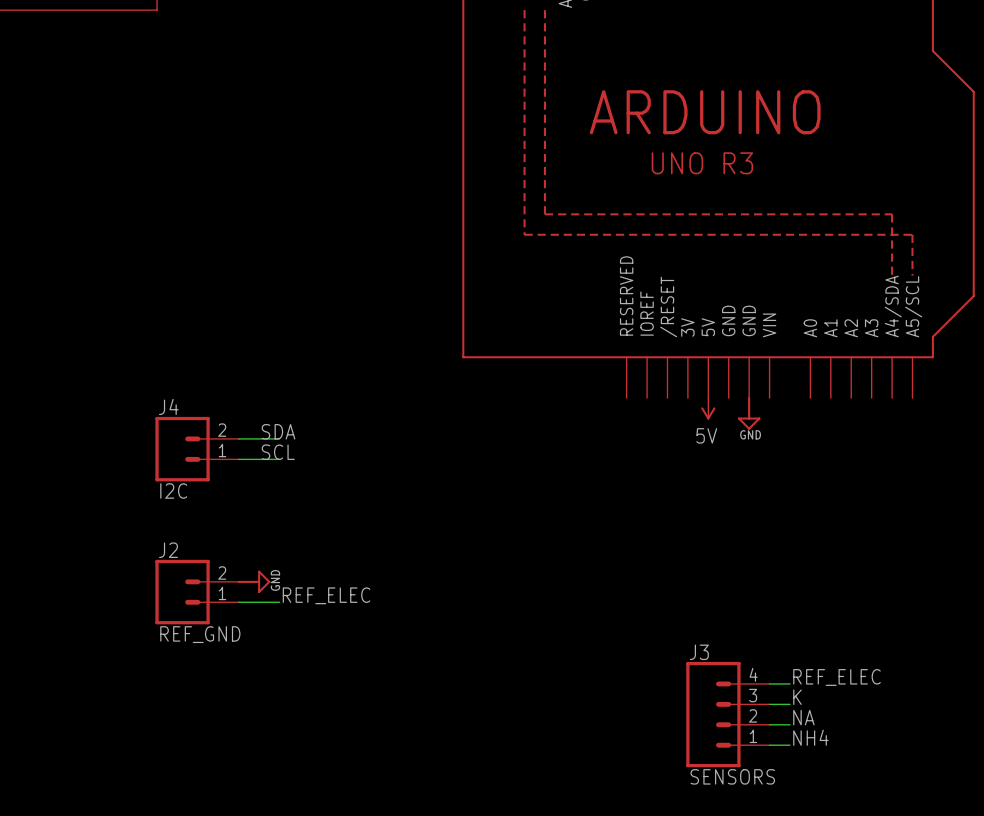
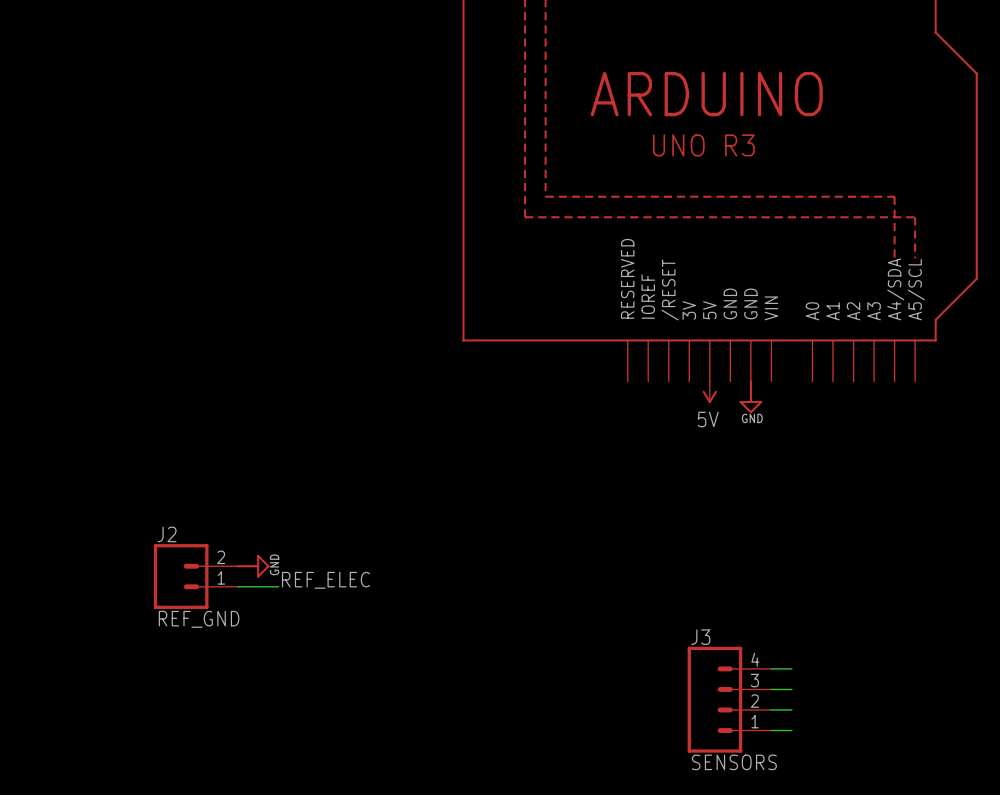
label: SDA (278, 431) -> none
wire: (238, 438) (279, 438) -> none
J4: I2C (197, 449) -> none
label: SCL (278, 452) -> none
wire: (238, 459) (279, 459) -> none
label: REF_ELEC (836, 677) -> none
label: K (797, 697) -> none
label: NA (803, 717) -> none
label: NH4 (810, 737) -> none

